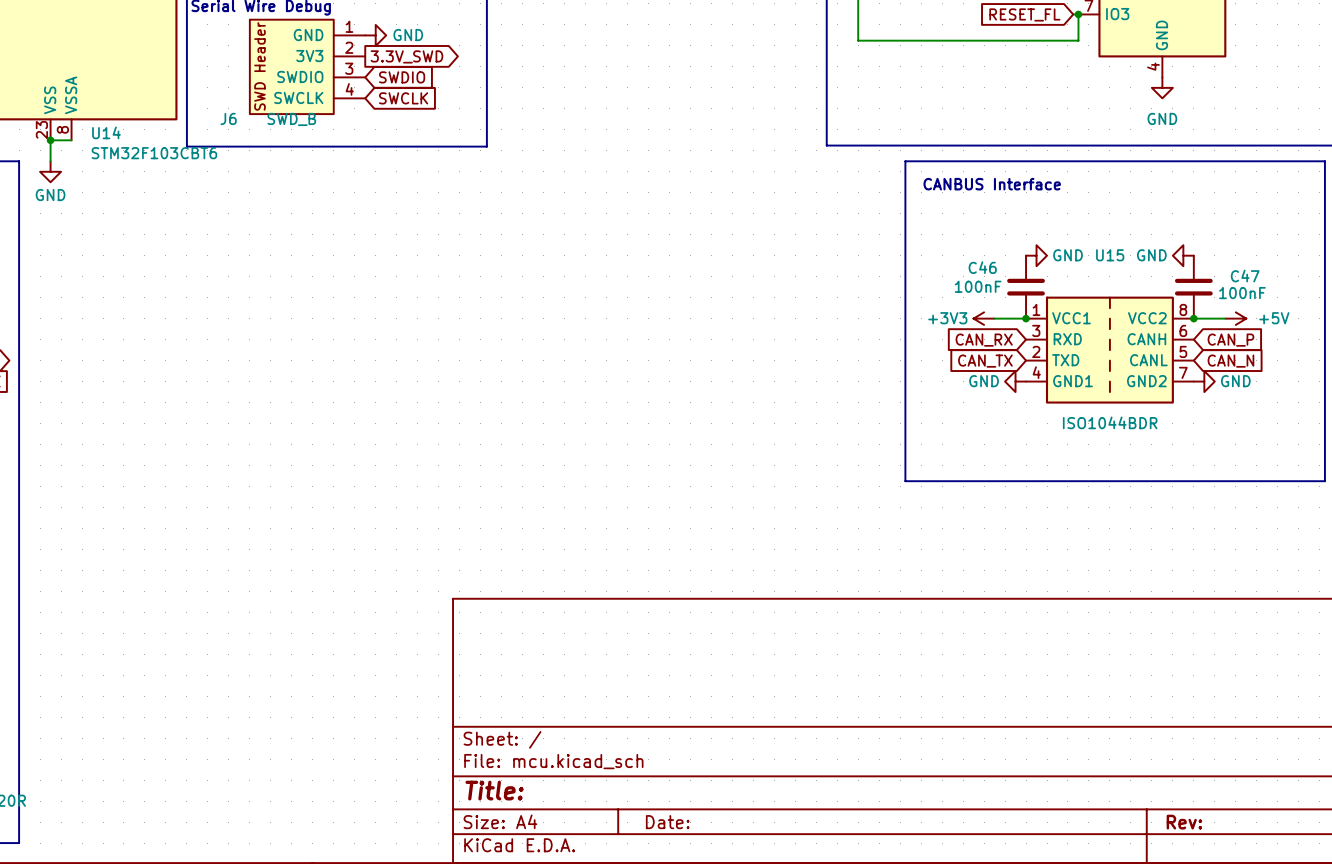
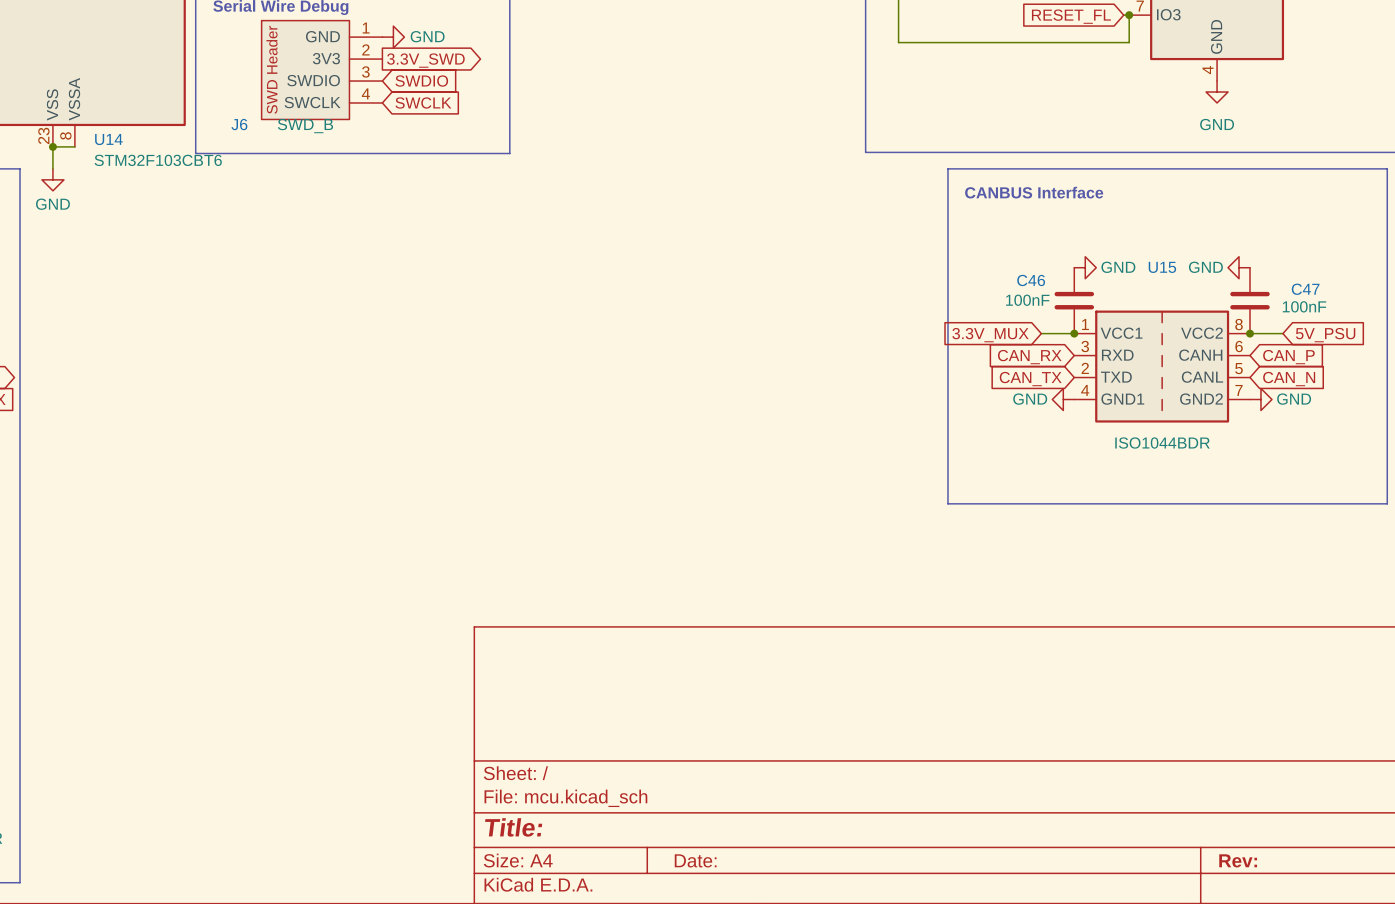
power symbol: +3V3 (984, 318) -> none
power symbol: +5V (1235, 318) -> none
global label: none -> 3.3V_MUX (990, 335)
global label: none -> 5V_PSU (1325, 335)

